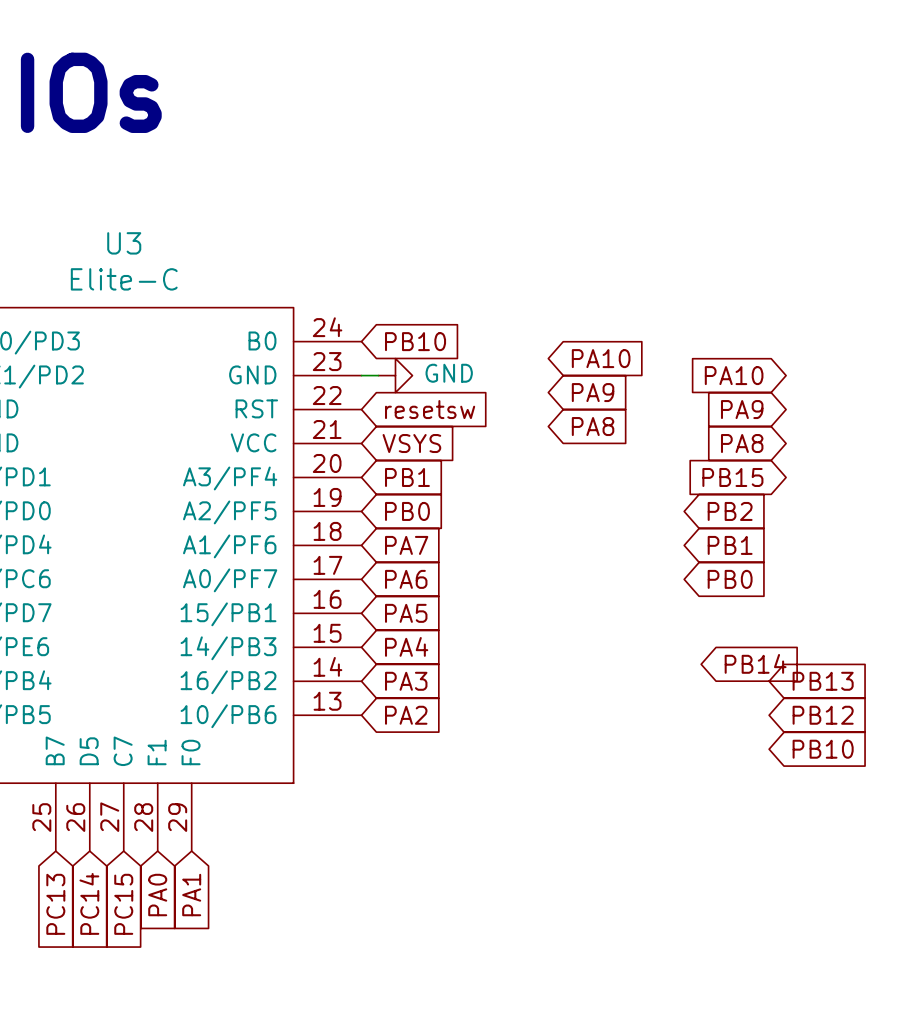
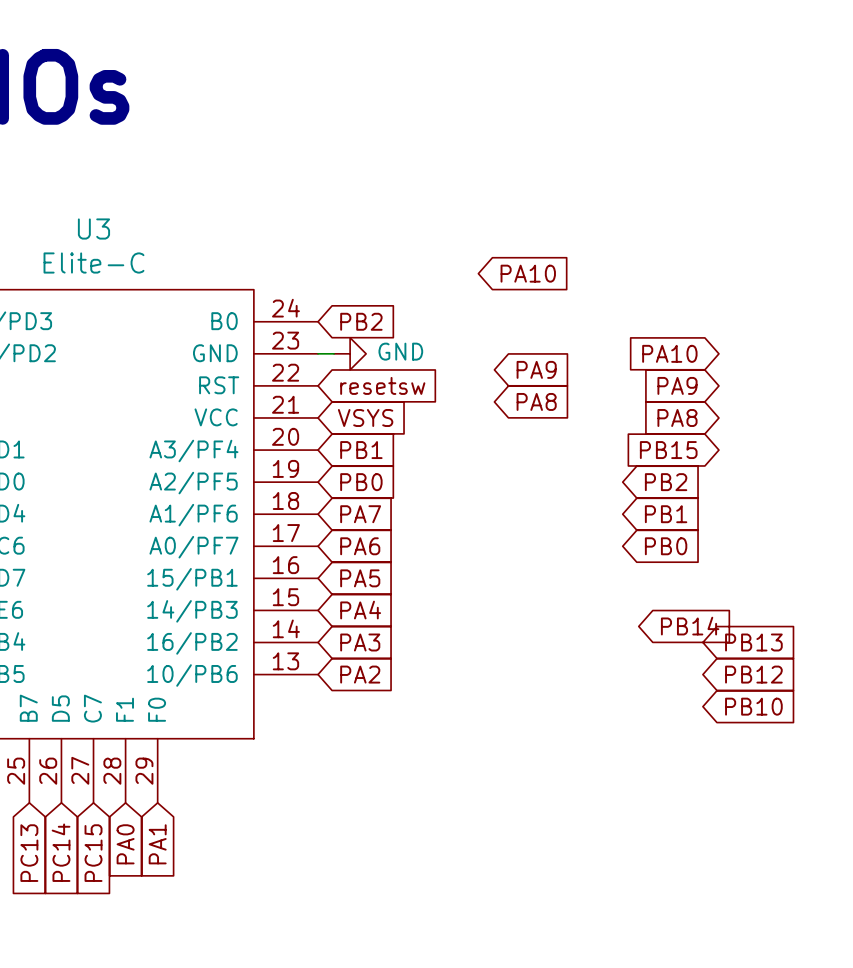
global label: PB10 (415, 341) -> PB2 (361, 321)
global label position: PA10 (601, 358) -> PA10 (528, 273)

